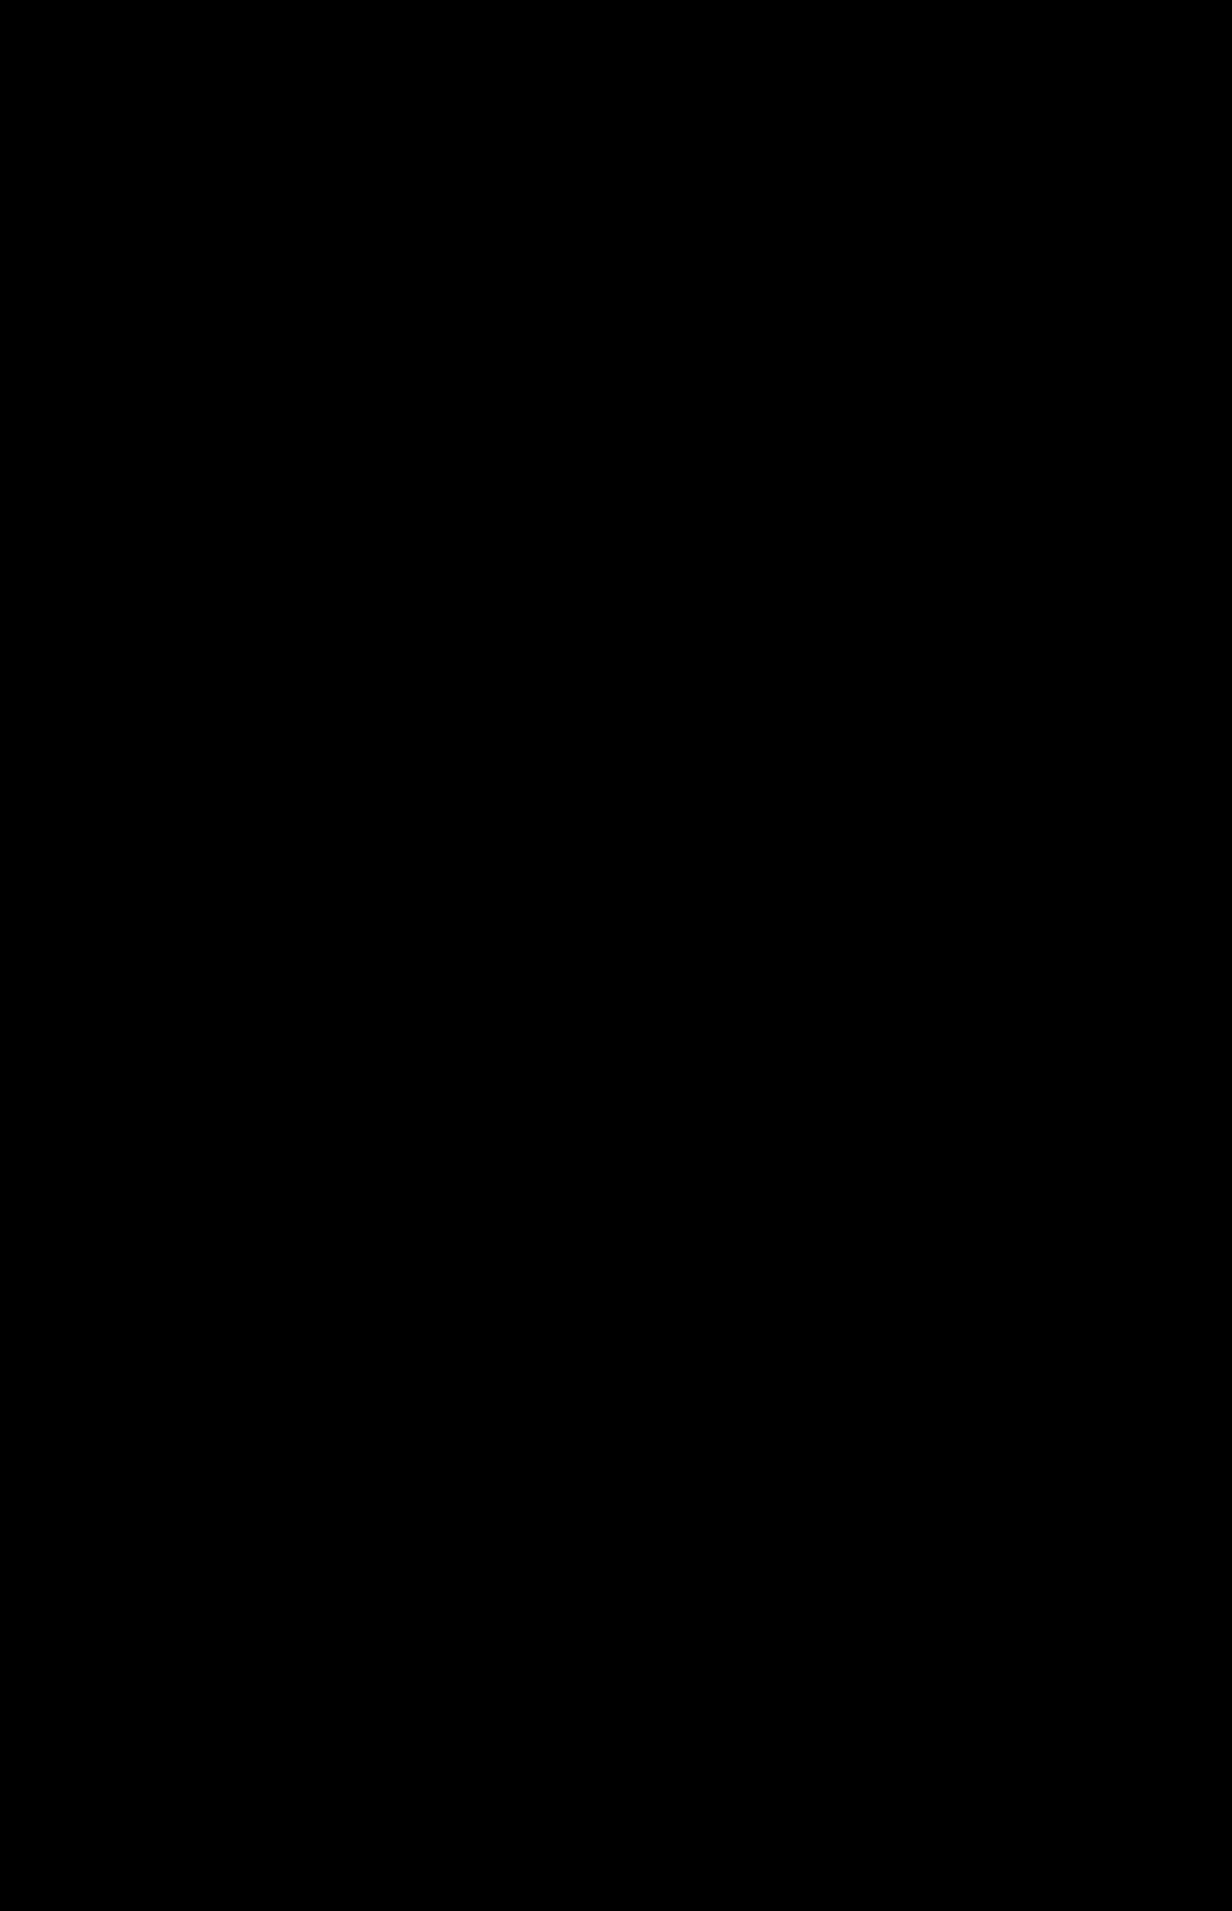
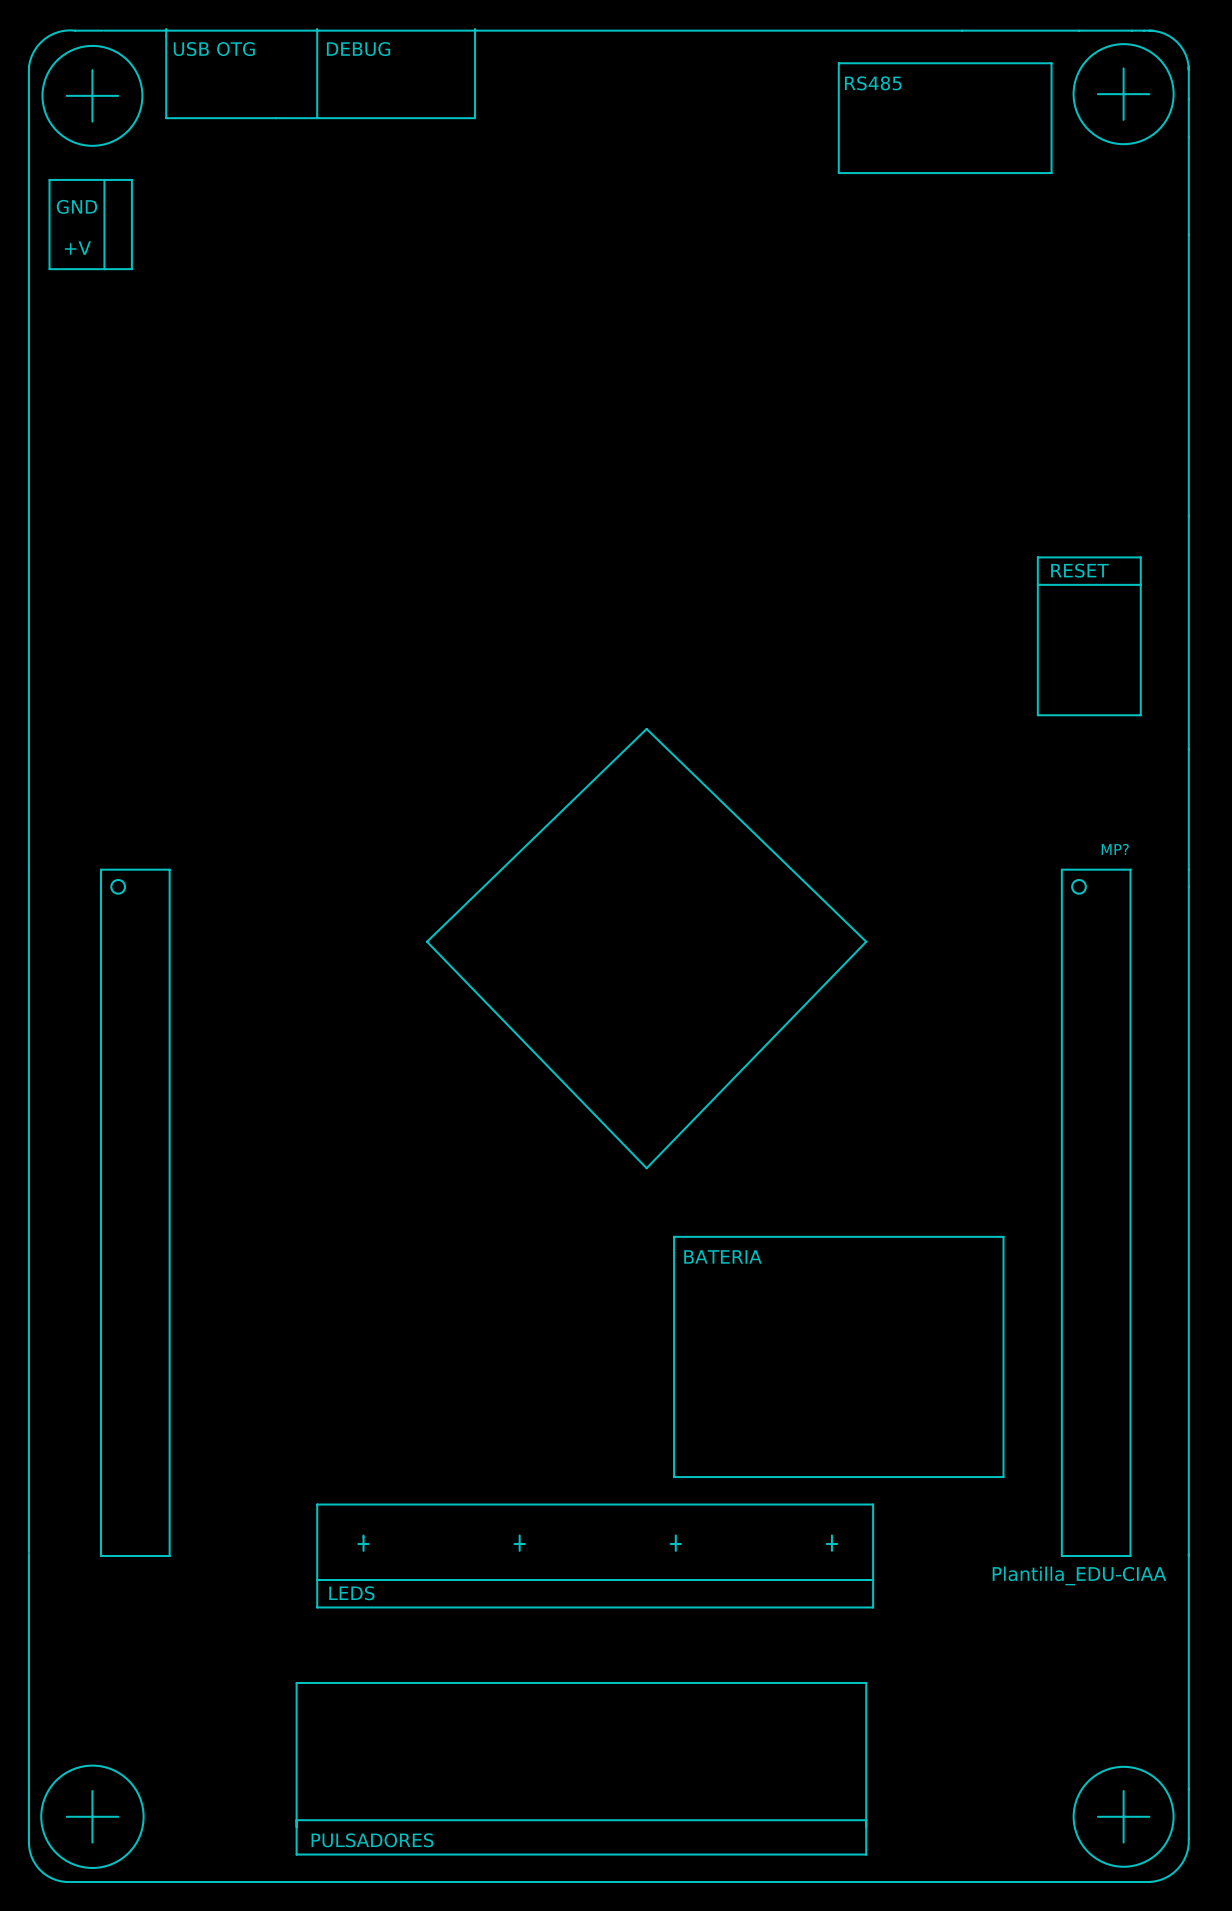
MP?: none -> Plantilla_EDU-CIAA (608, 955)

